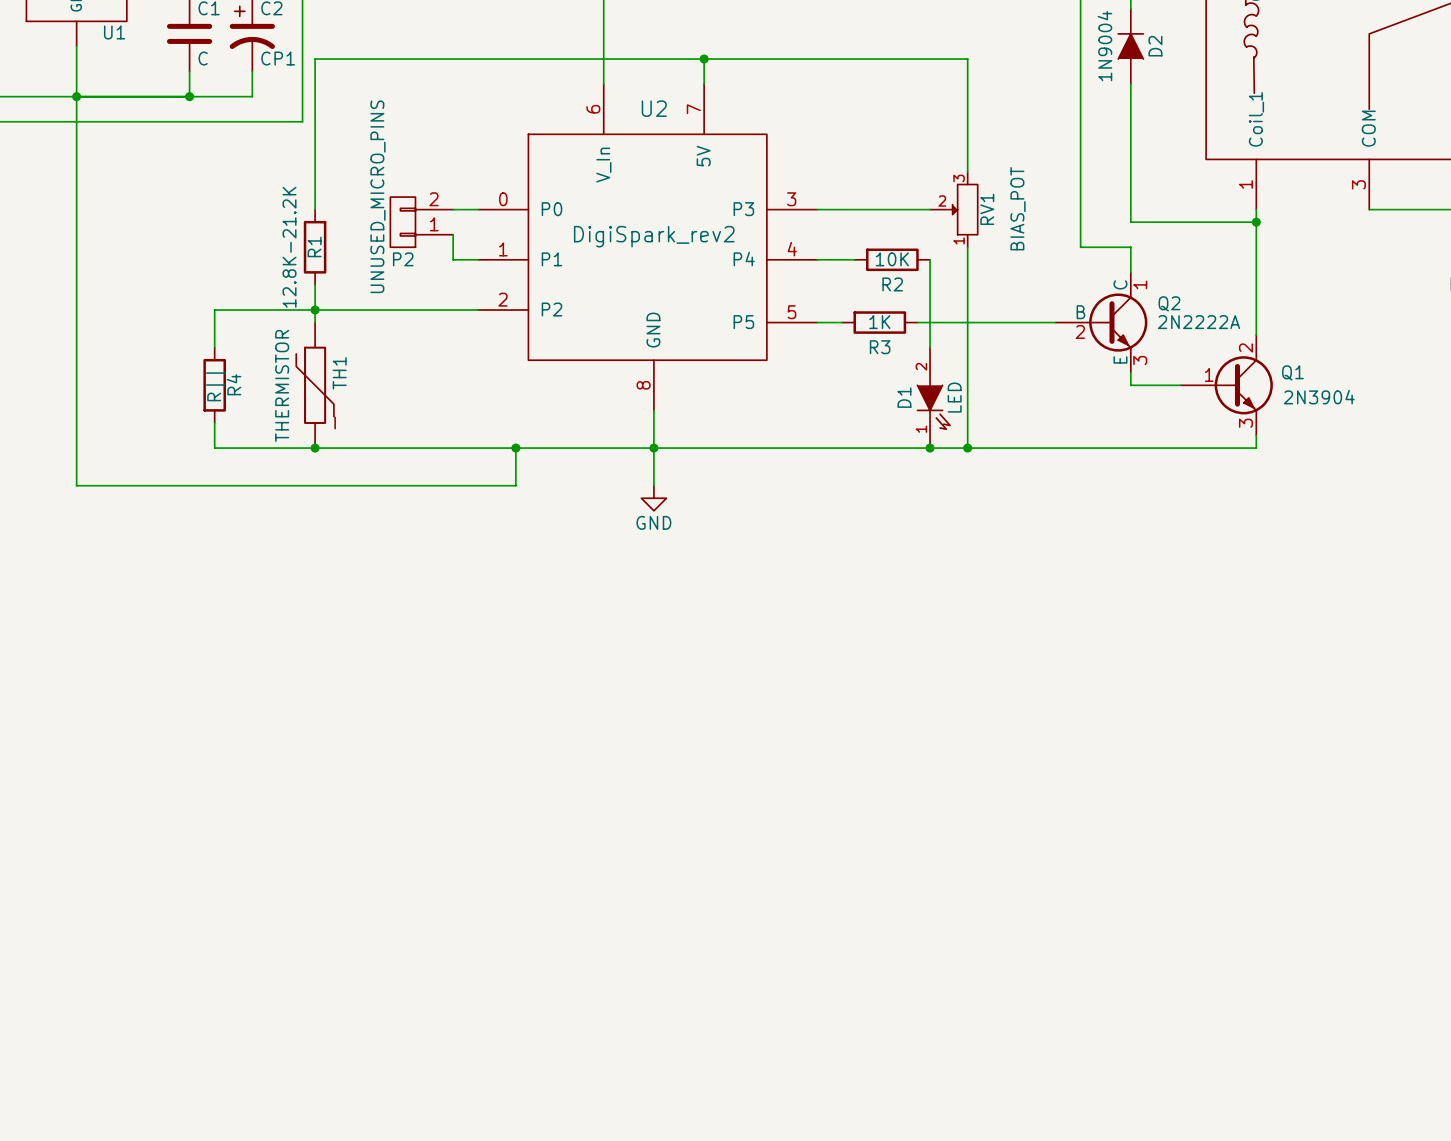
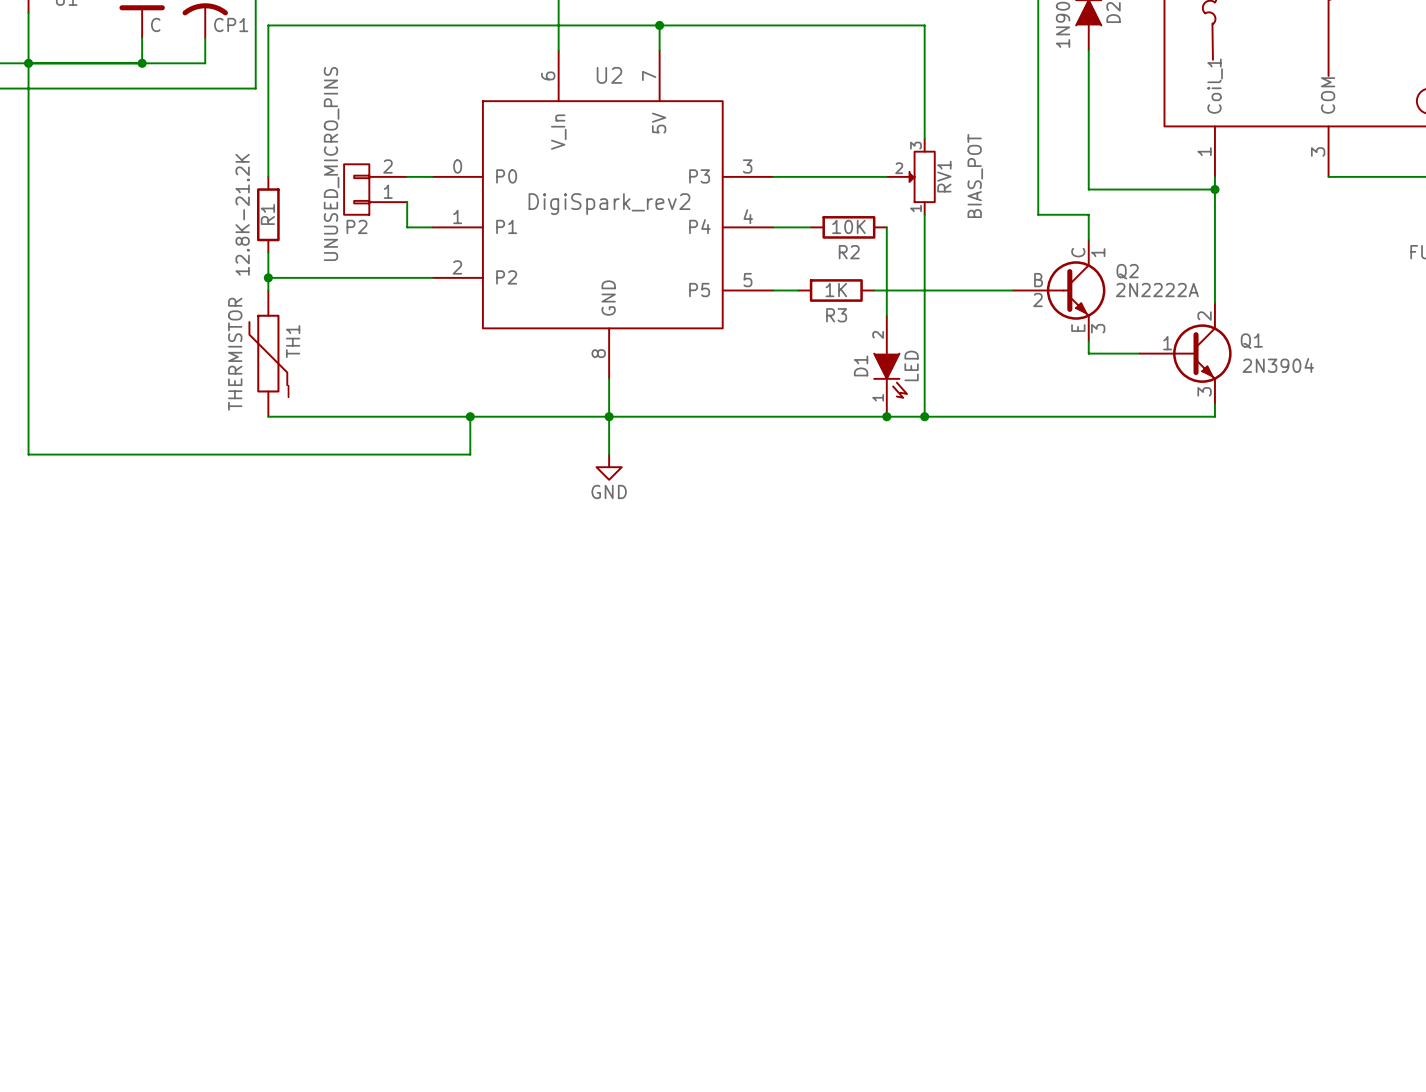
wire: (315, 310) (214, 310) (214, 347) -> none
R4: R|| (214, 385) -> none
wire: (214, 422) (214, 448) (315, 448) -> none
junction: (315, 448) -> none

